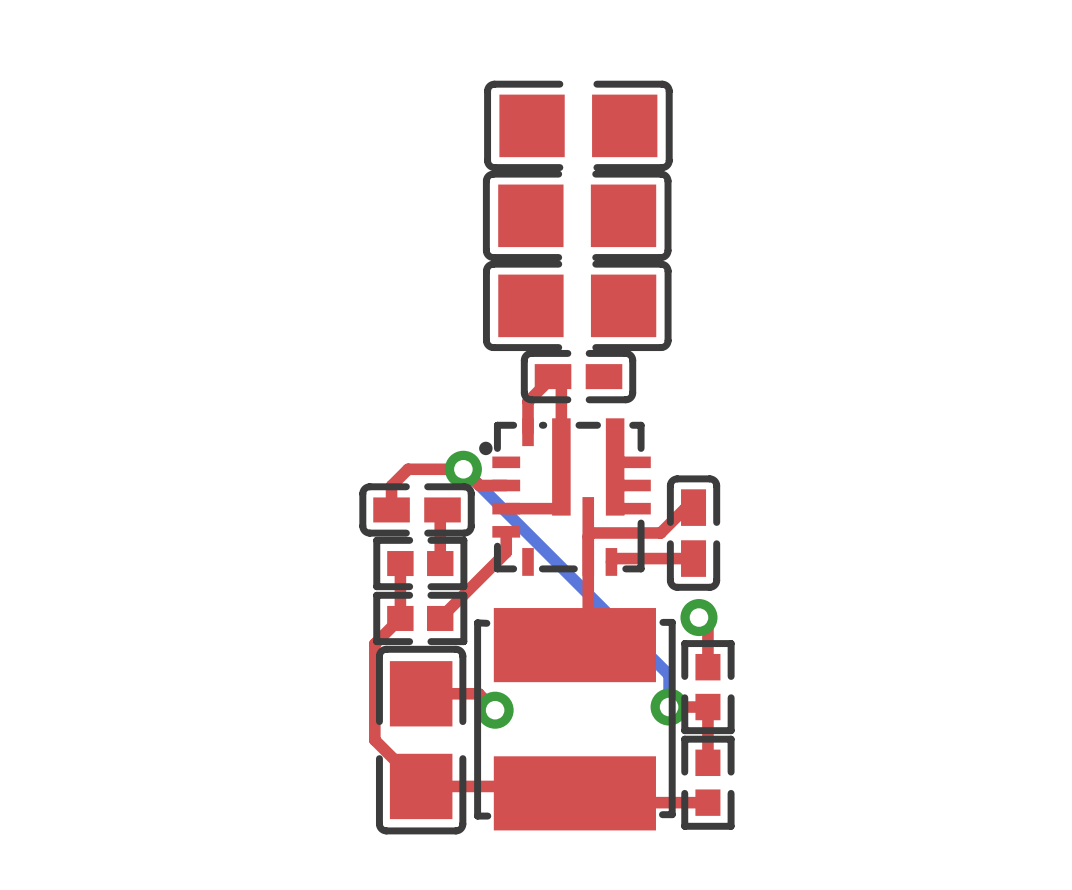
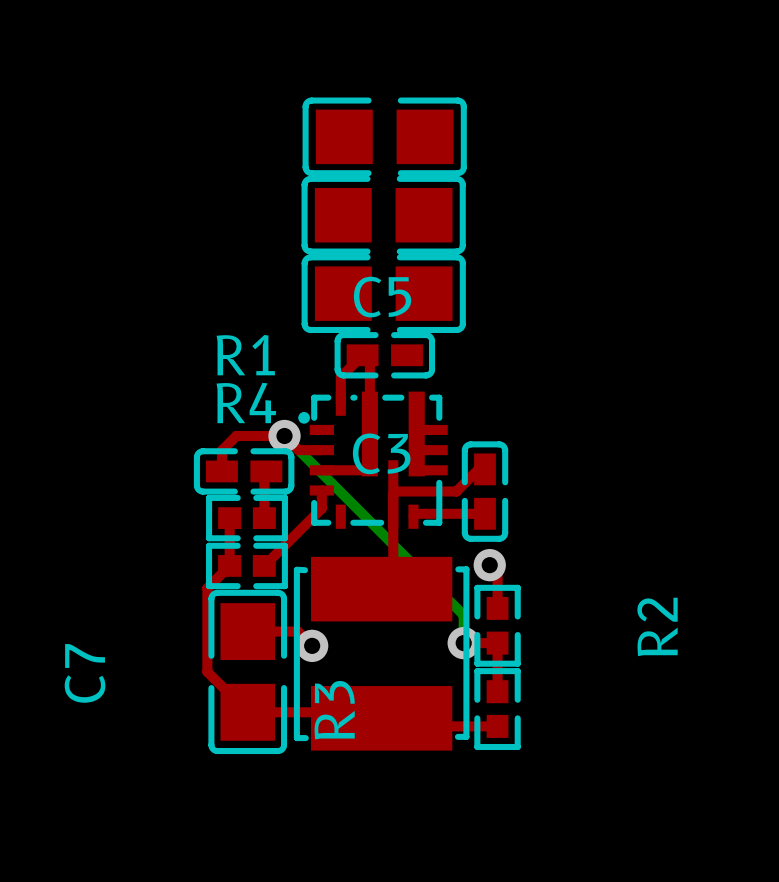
C5 name: none -> C5 (382, 297)
R1 name: none -> R1 (245, 355)
R4 name: none -> R4 (246, 403)
C3 name: none -> C3 (381, 453)
R2 name: none -> R2 (657, 626)
C7 name: none -> C7 (85, 673)
R3 name: none -> R3 (334, 710)

